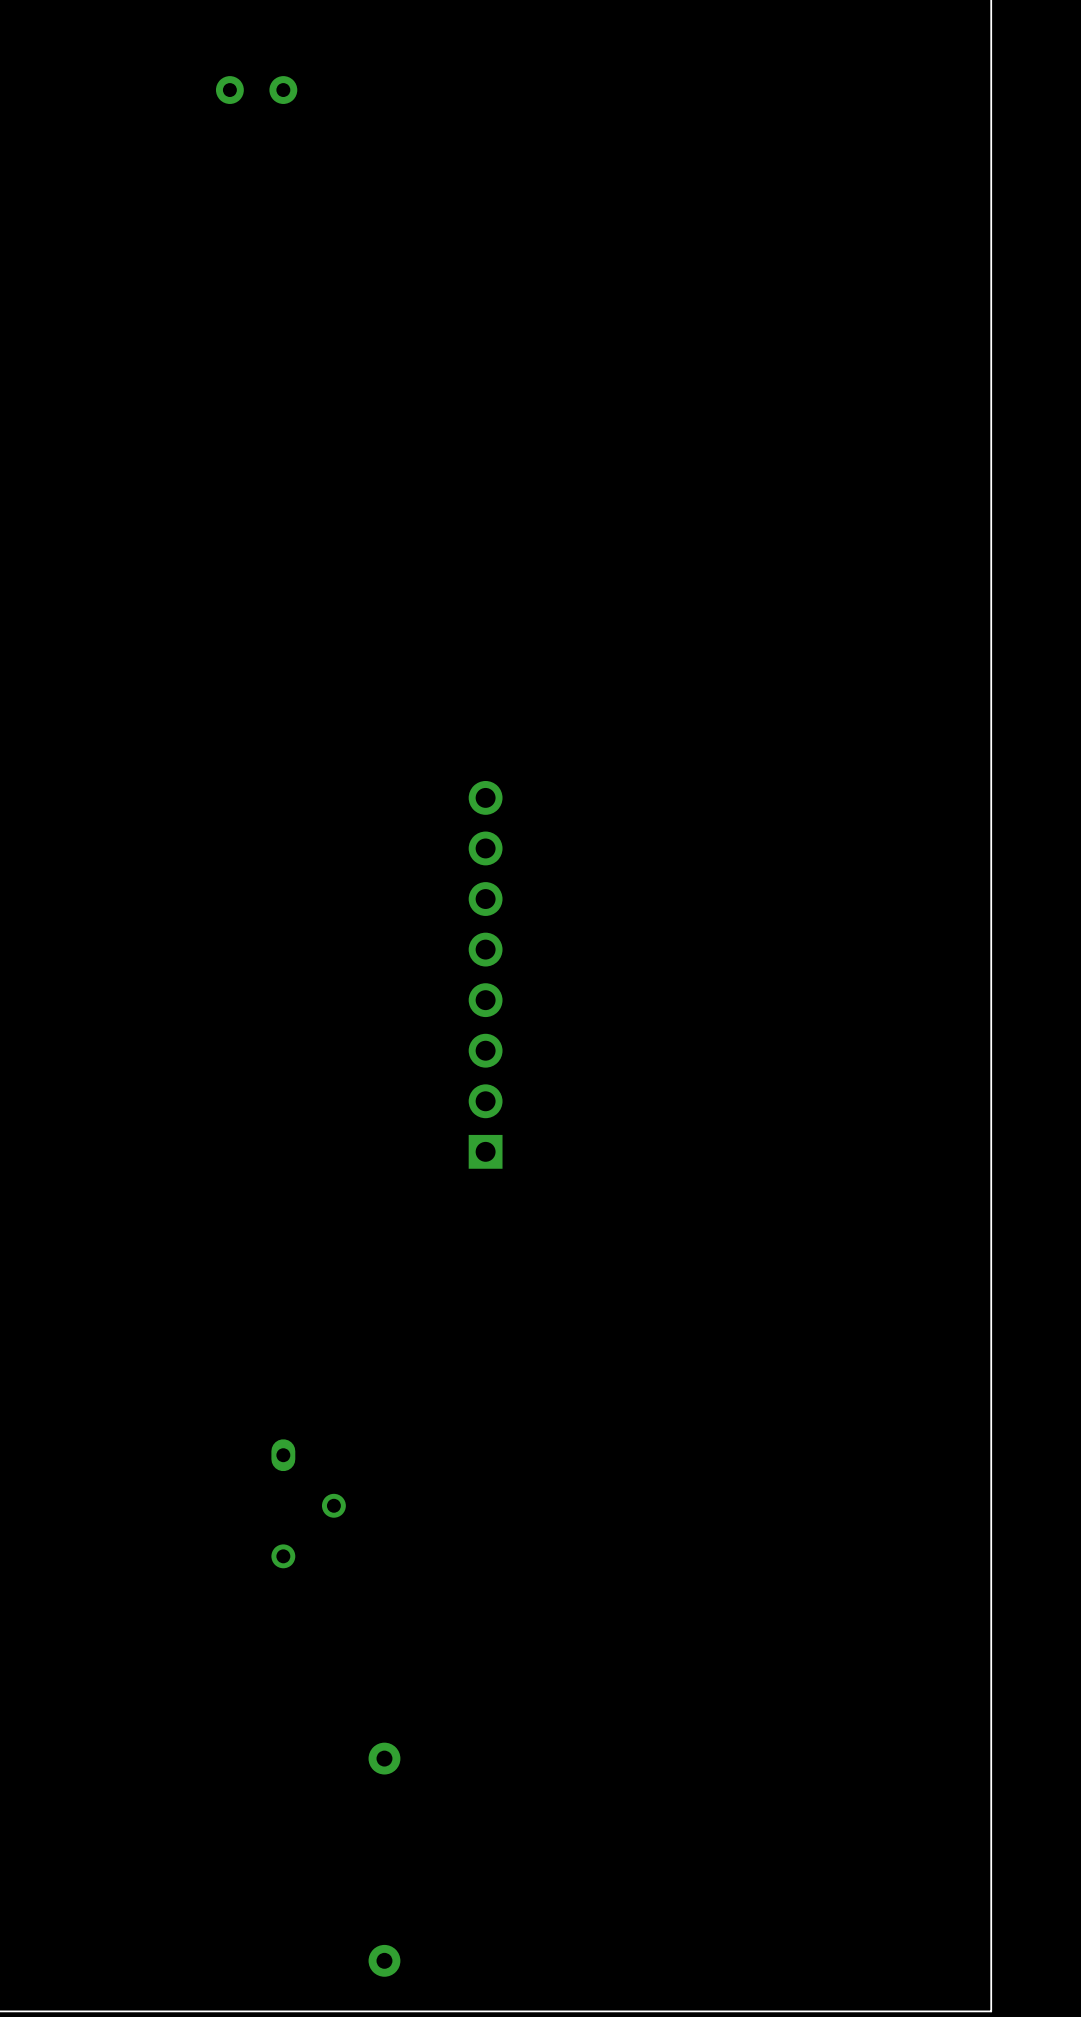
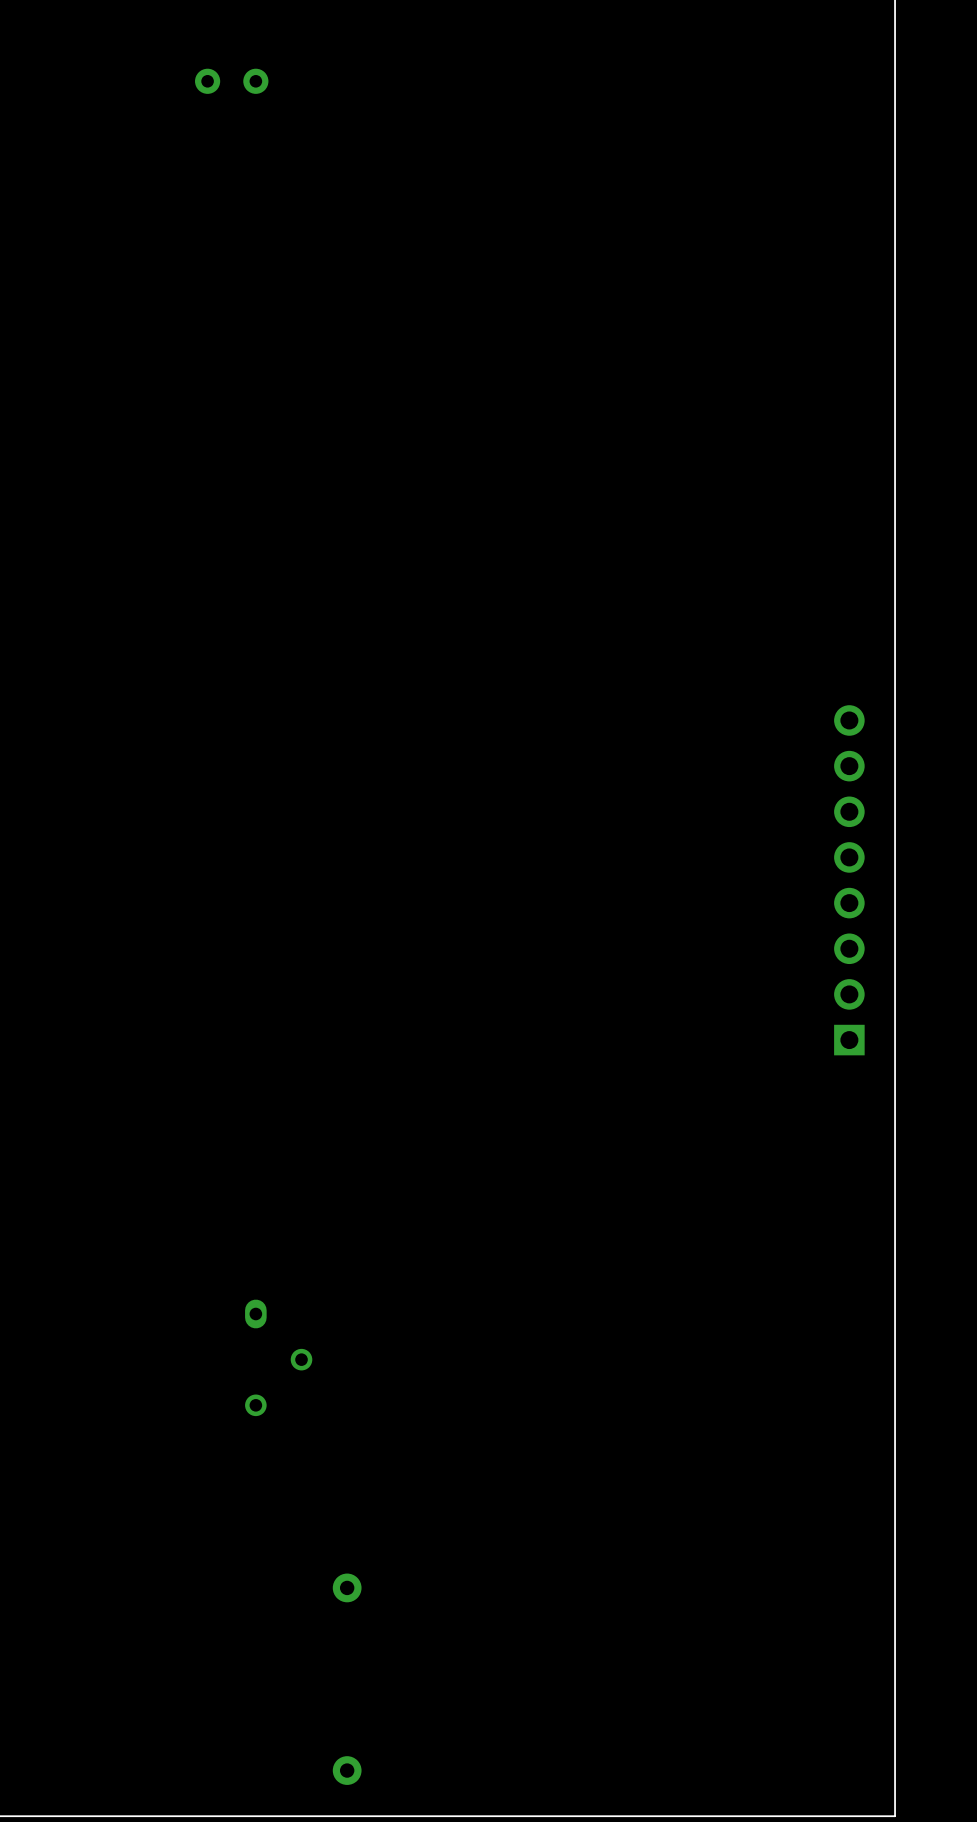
part position: (485, 974) -> (849, 880)

